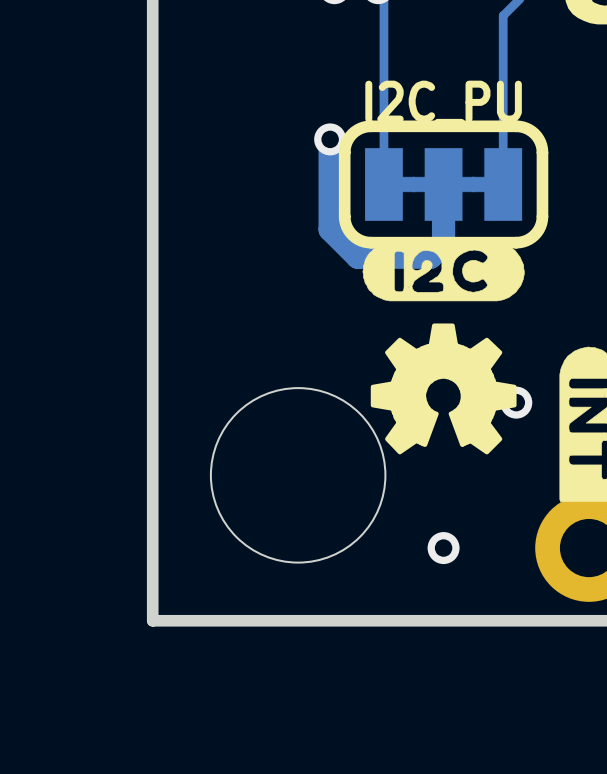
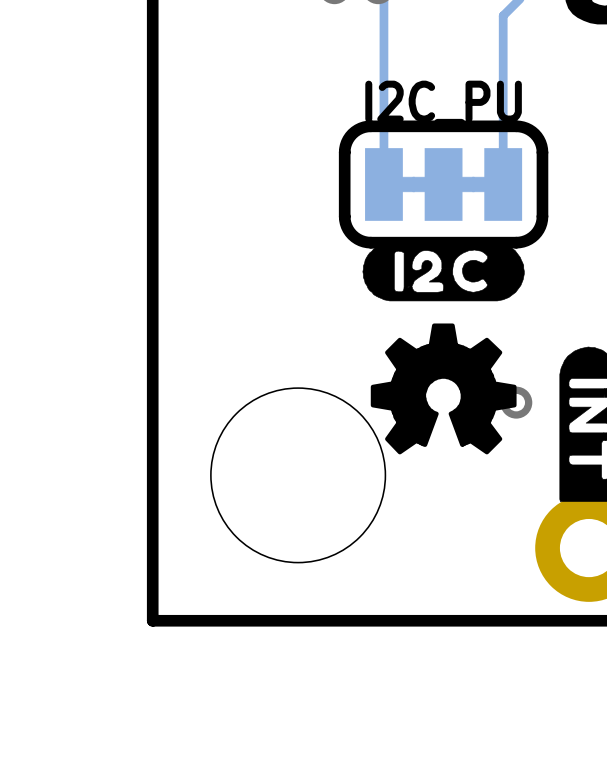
track: (330, 139) (330, 229) (357, 257) (430, 257) (443, 244) (443, 184) -> none
via: (330, 139) -> none
via: (443, 548) -> none

